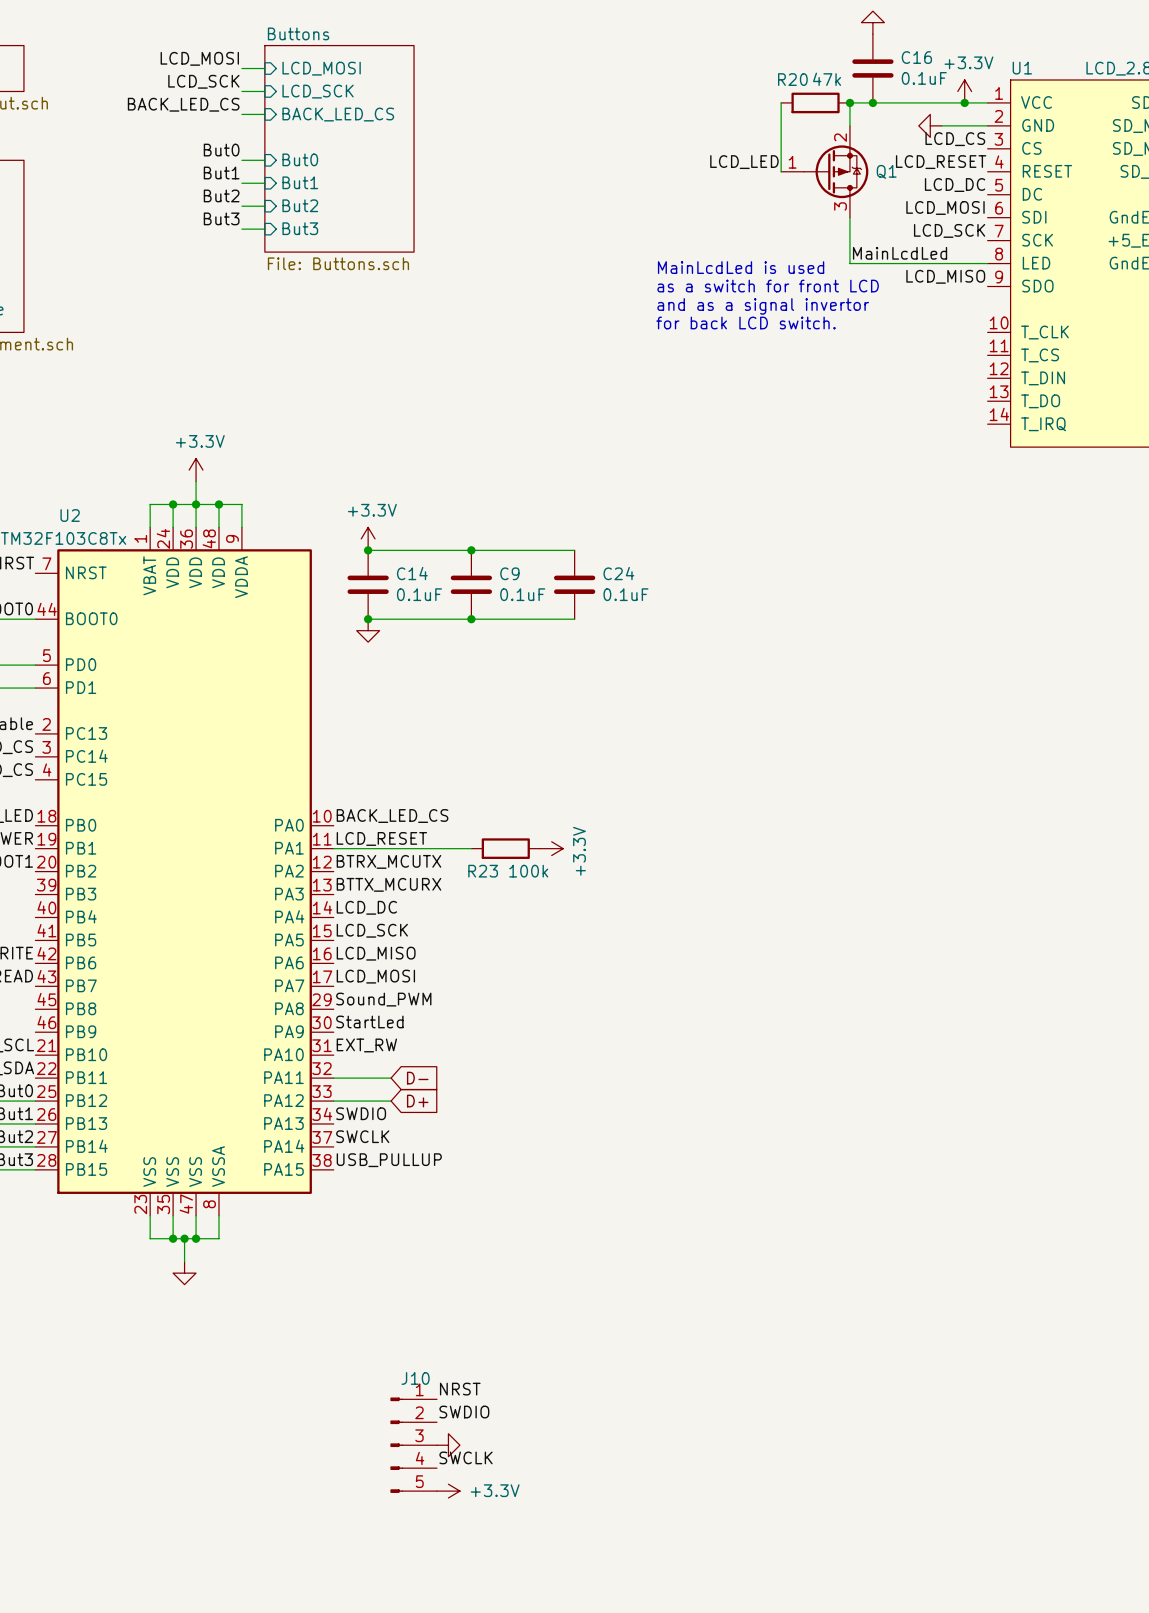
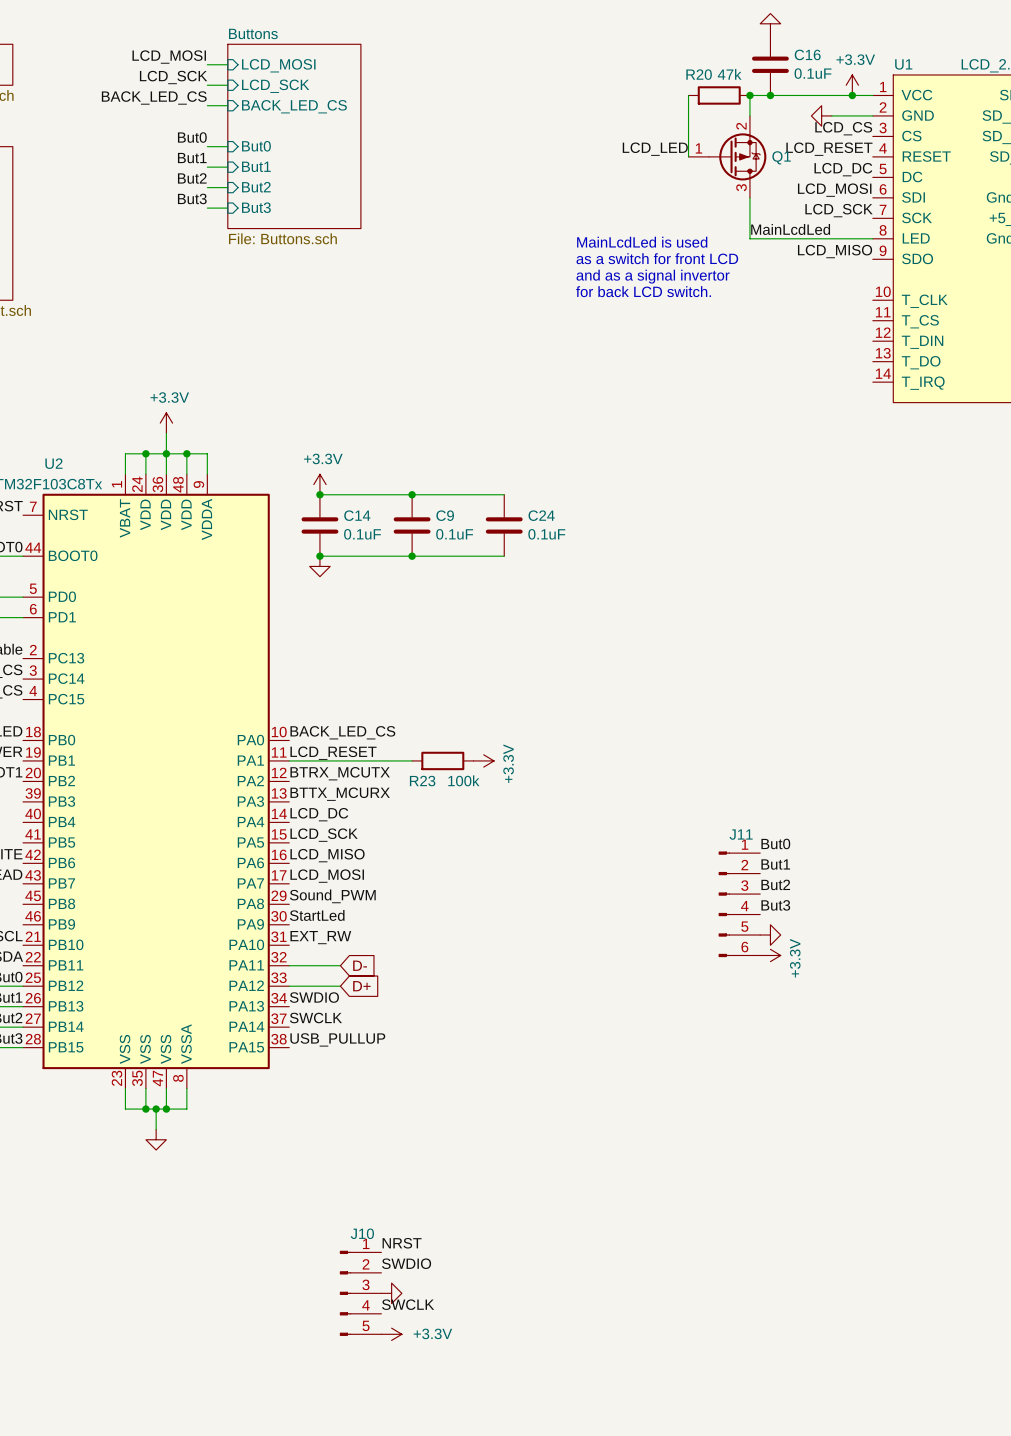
label: none -> But0 (775, 843)
label: none -> But1 (775, 864)
label: none -> But2 (775, 884)
J11: none -> (739, 904)
label: none -> But3 (775, 905)
power symbol: none -> (770, 935)
power symbol: none -> +3.3V (770, 955)

